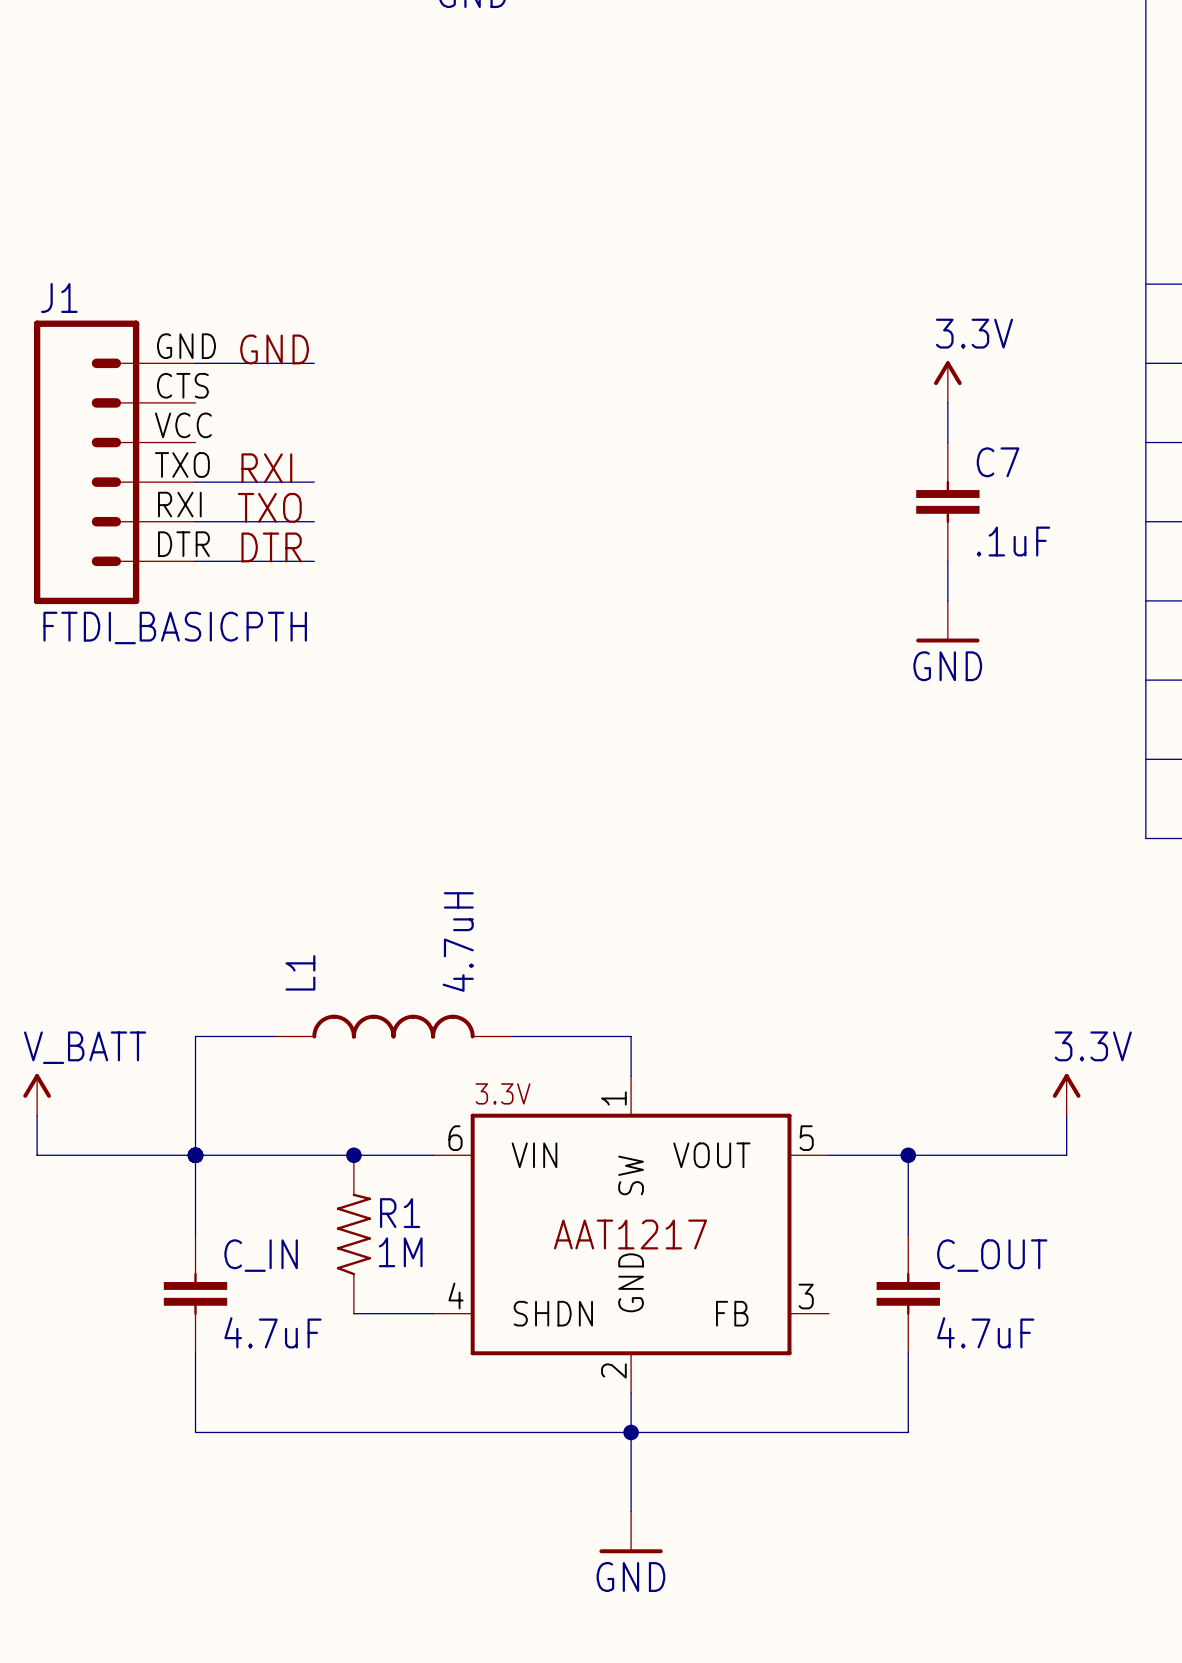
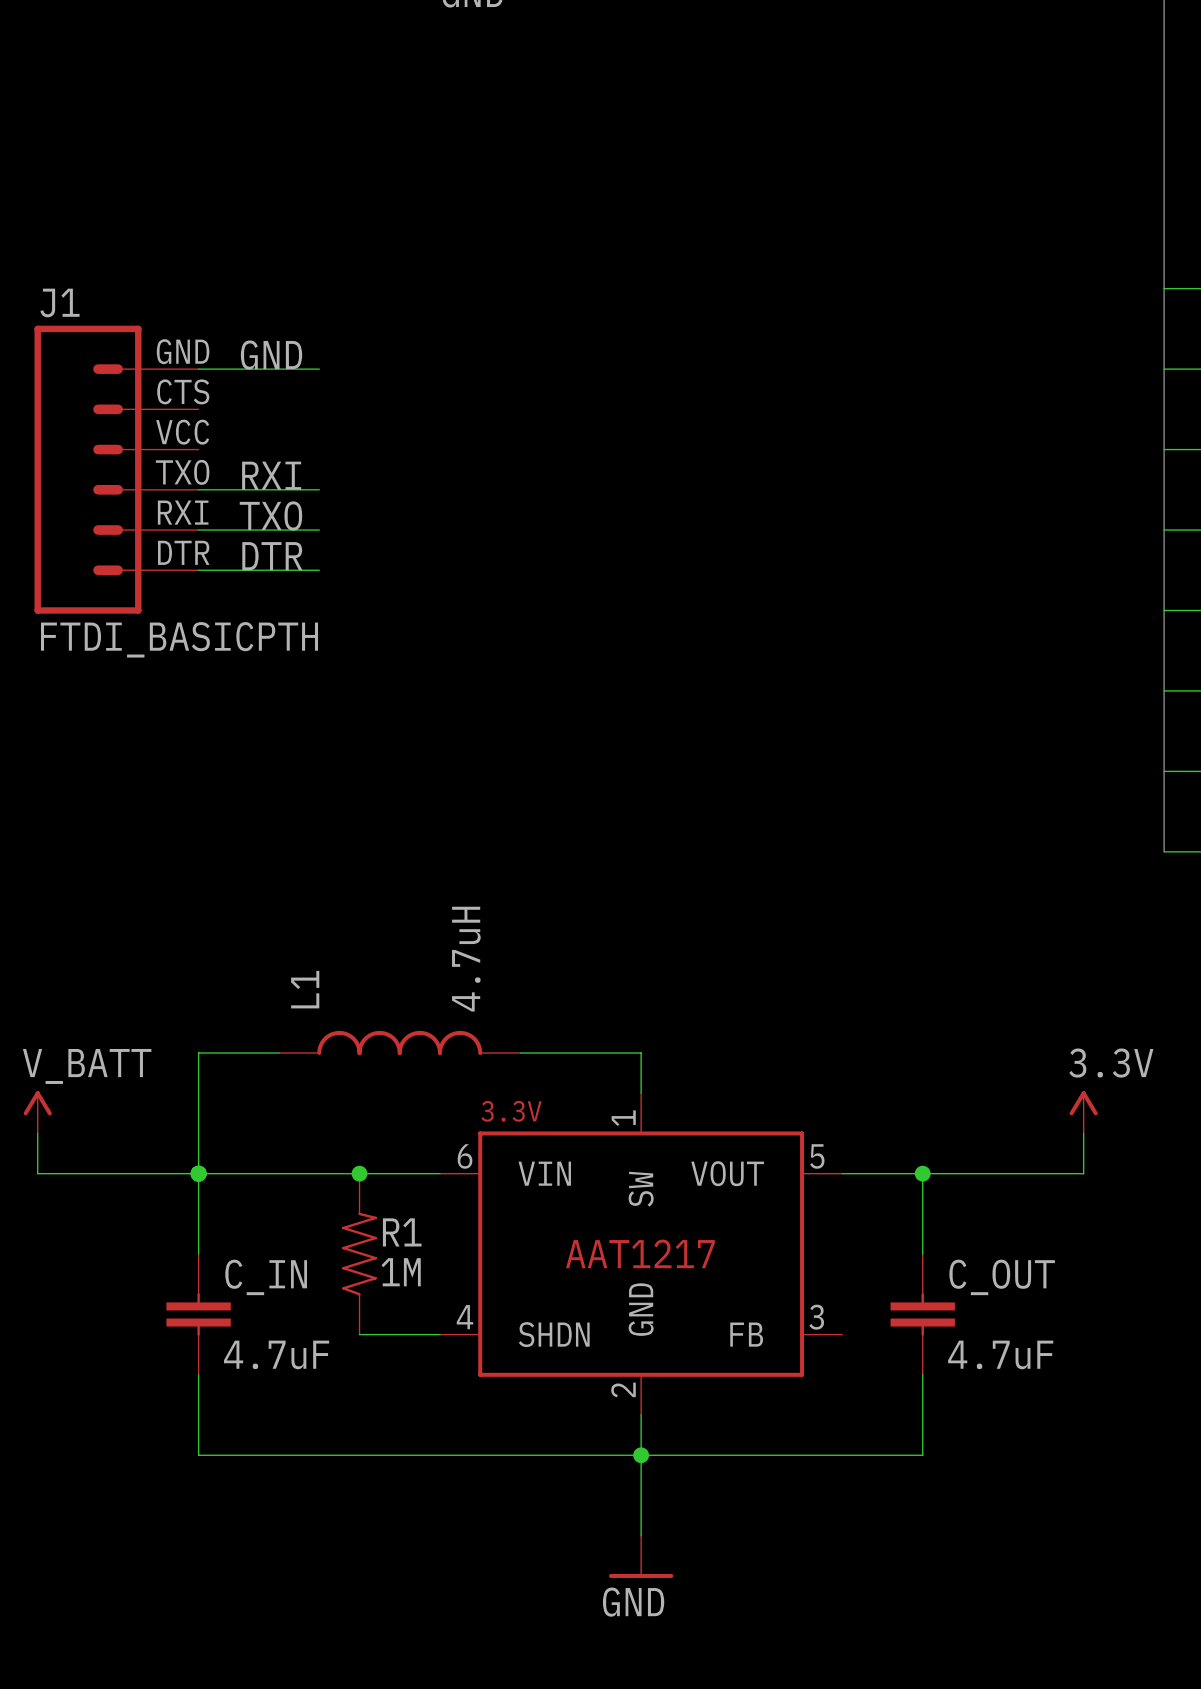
power symbol: 3.3V (947, 382) -> none
wire: (947, 402) (947, 442) -> none
C7: .1uF (947, 501) -> none
wire: (947, 561) (947, 600) -> none
power symbol: GND (947, 621) -> none

